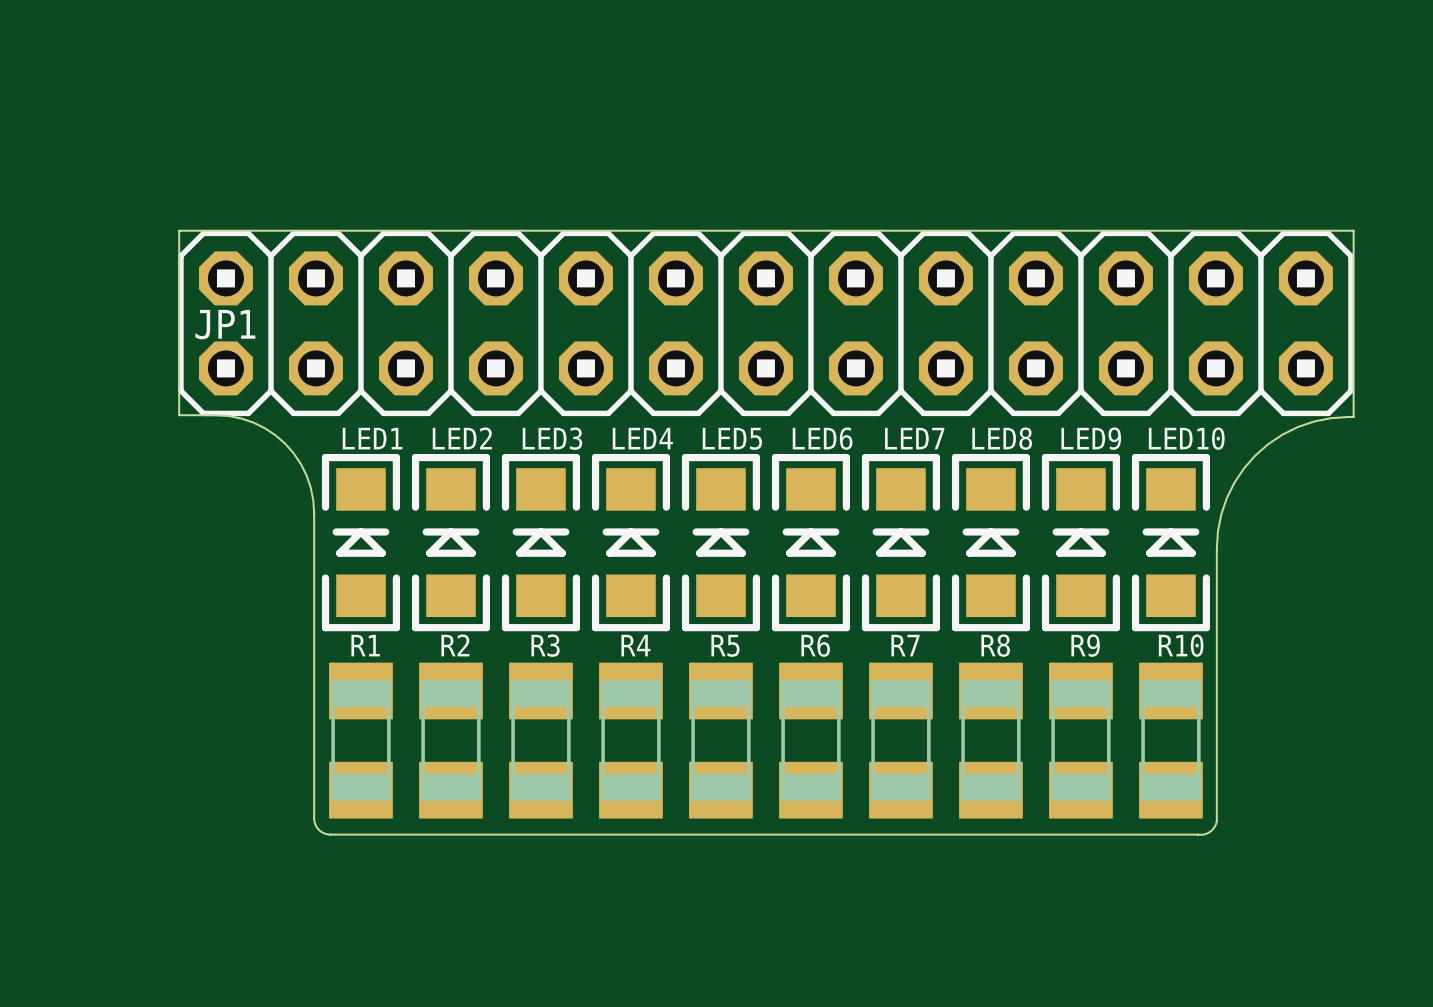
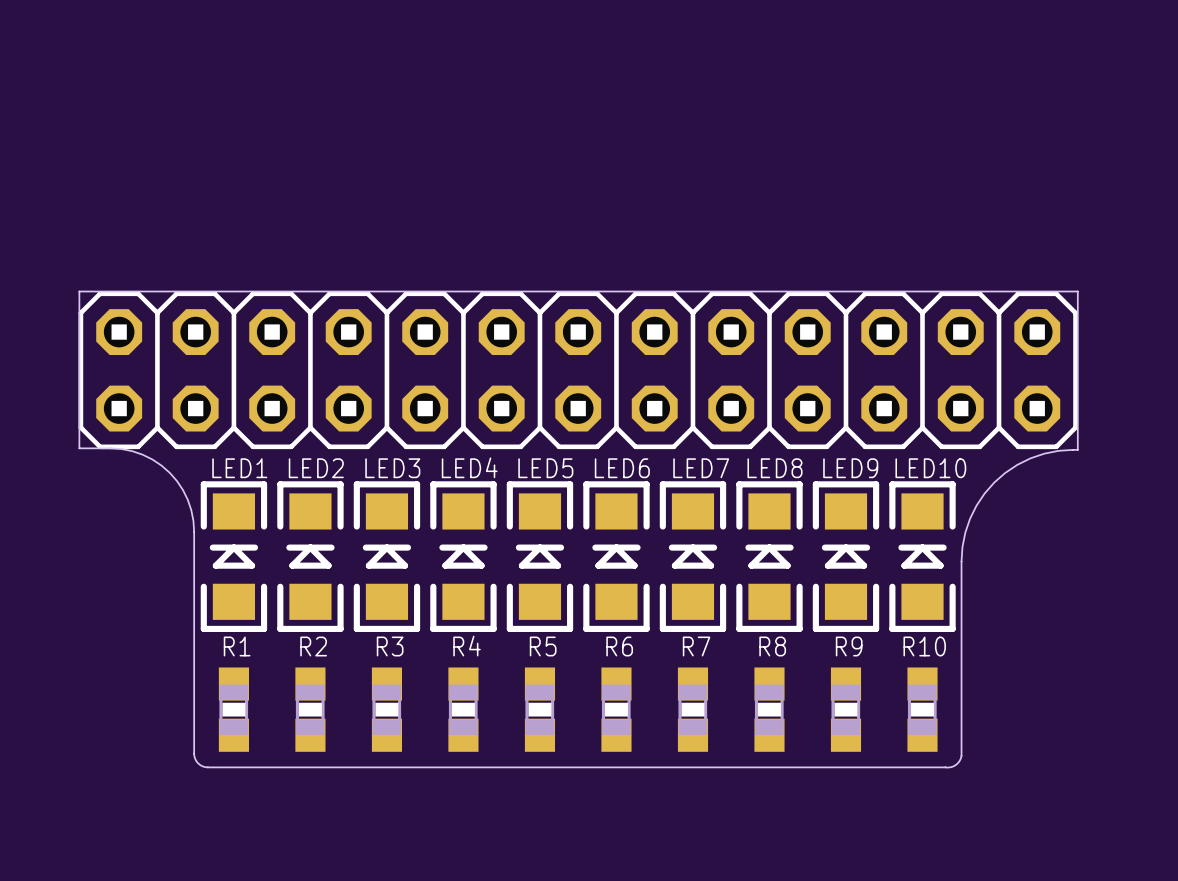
JP1 name: JP1 (225, 324) -> none
R1 footprint: [329, 662, 393, 819] -> [218, 667, 249, 752]
R2 footprint: [419, 662, 483, 819] -> [295, 667, 326, 752]
R3 footprint: [509, 662, 573, 819] -> [371, 667, 403, 752]
R4 footprint: [599, 662, 663, 819] -> [448, 667, 479, 752]
R5 footprint: [689, 662, 753, 819] -> [524, 667, 556, 752]
R6 footprint: [779, 662, 843, 819] -> [601, 667, 632, 752]
R7 footprint: [869, 662, 933, 819] -> [677, 667, 709, 752]
R8 footprint: [959, 662, 1023, 819] -> [754, 667, 785, 752]
R9 footprint: [1049, 662, 1113, 819] -> [830, 667, 862, 752]
R10 footprint: [1139, 662, 1203, 819] -> [907, 667, 938, 752]
board edge: (314, 774) (314, 822) (320, 831) (330, 834) (1202, 834) (1210, 831) (1216, 823) (1216, 777) -> (194, 753) (198, 763) (207, 767) (947, 767) (955, 764) (961, 755)

